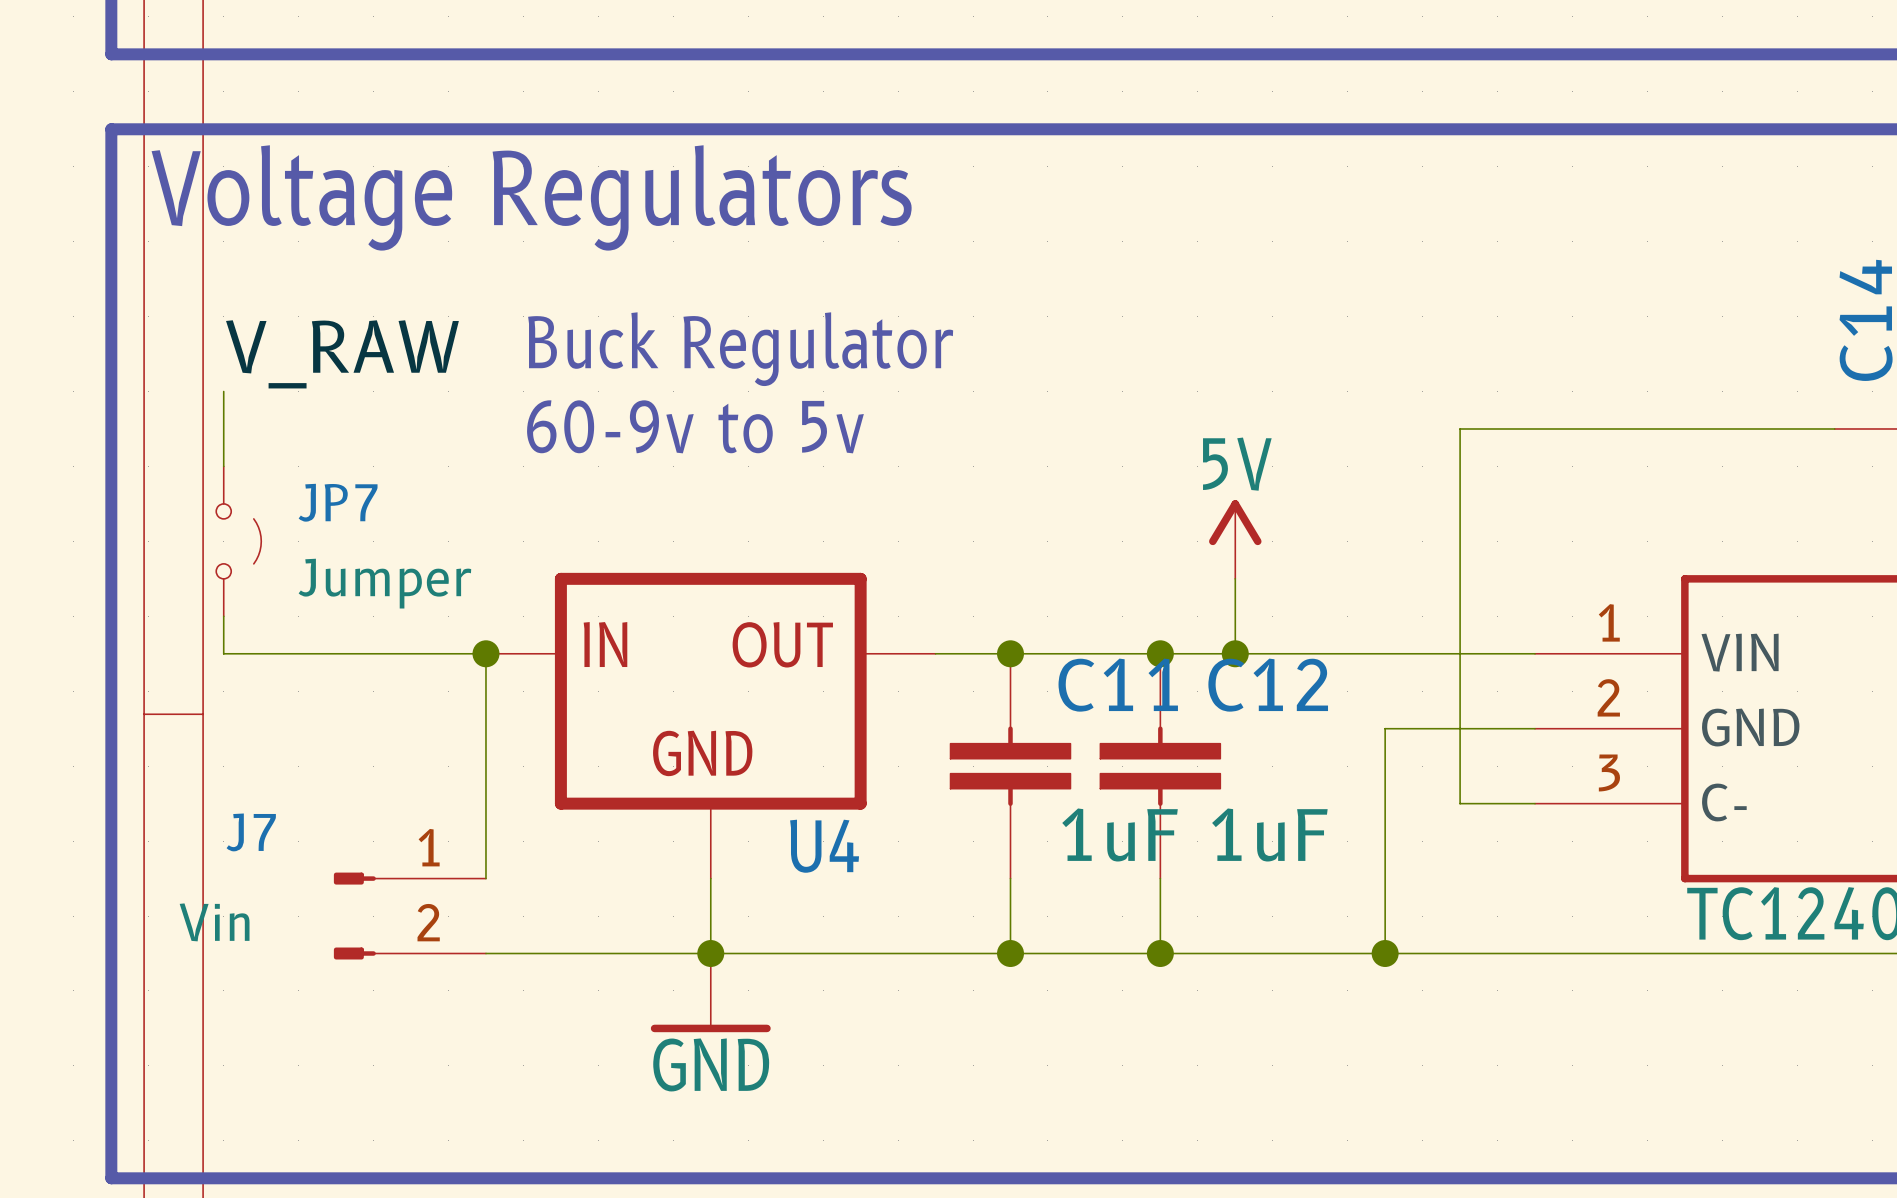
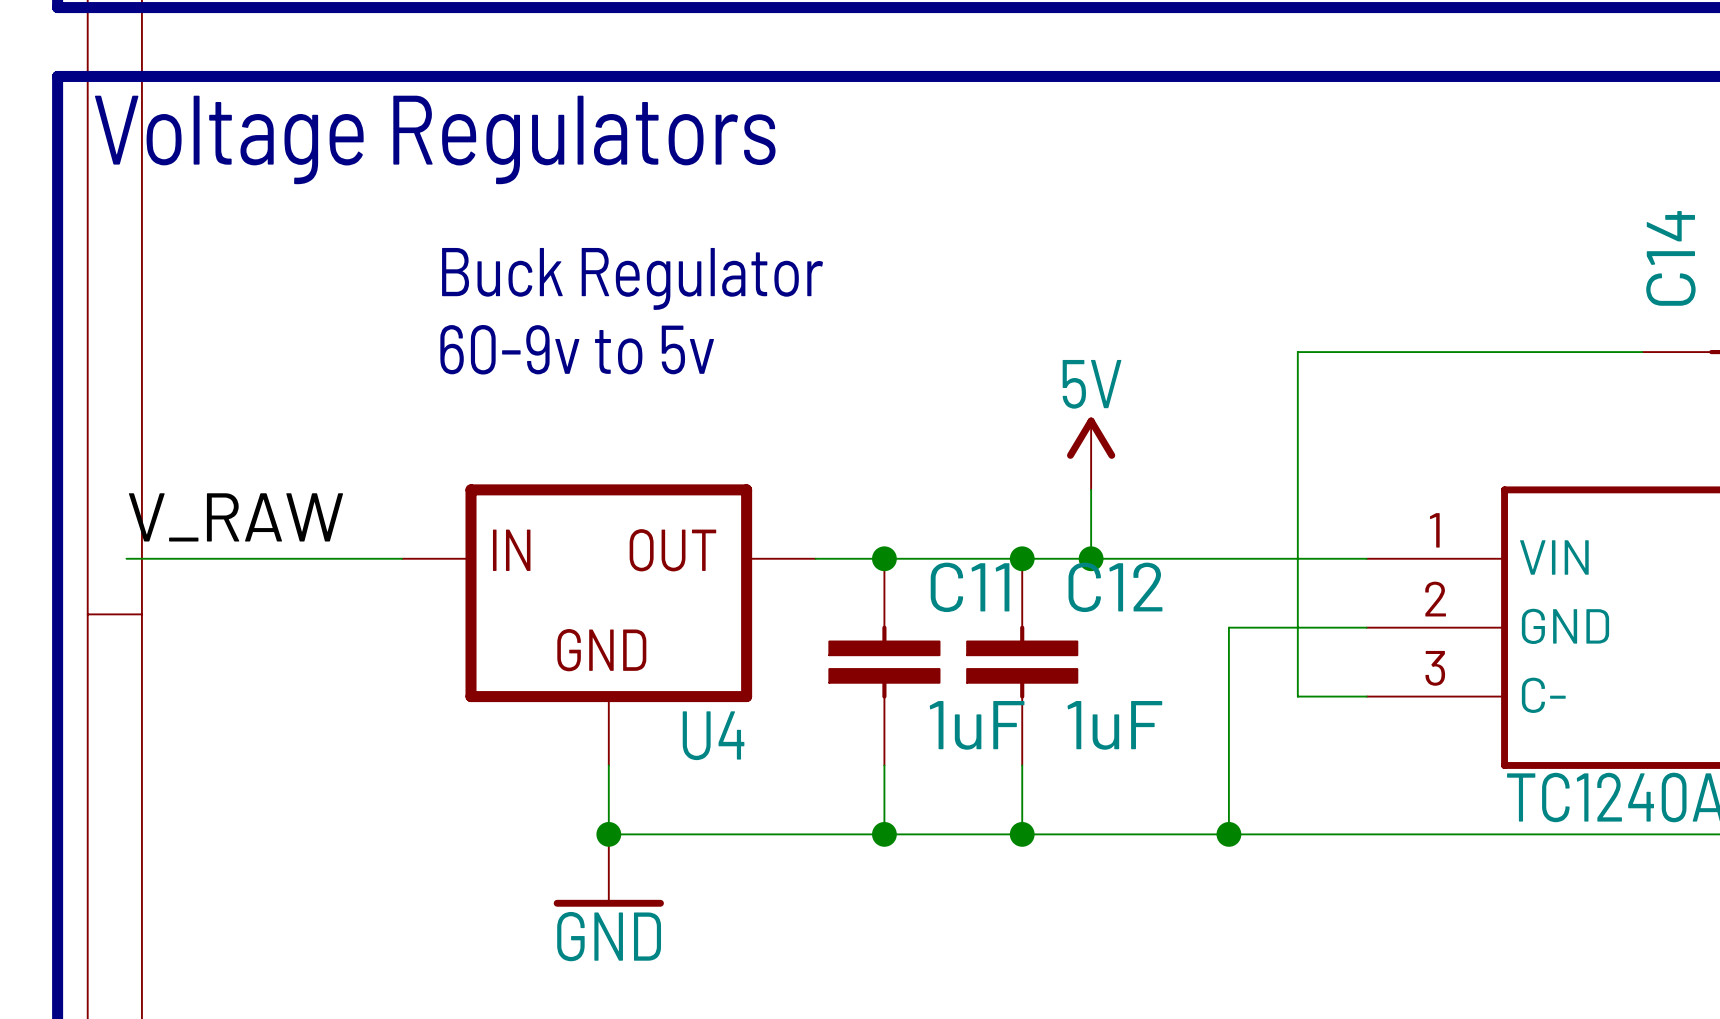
label position: V_RAW (342, 354) -> V_RAW (235, 517)
wire: (223, 391) (223, 466) -> none
JP7: Jumper (238, 541) -> none
wire: (223, 616) (223, 653) -> (126, 558) (160, 558)
wire: (485, 653) (485, 878) -> none
junction: (485, 653) -> none
J7: Vin (409, 916) -> none
wire: (485, 953) (710, 953) -> none

